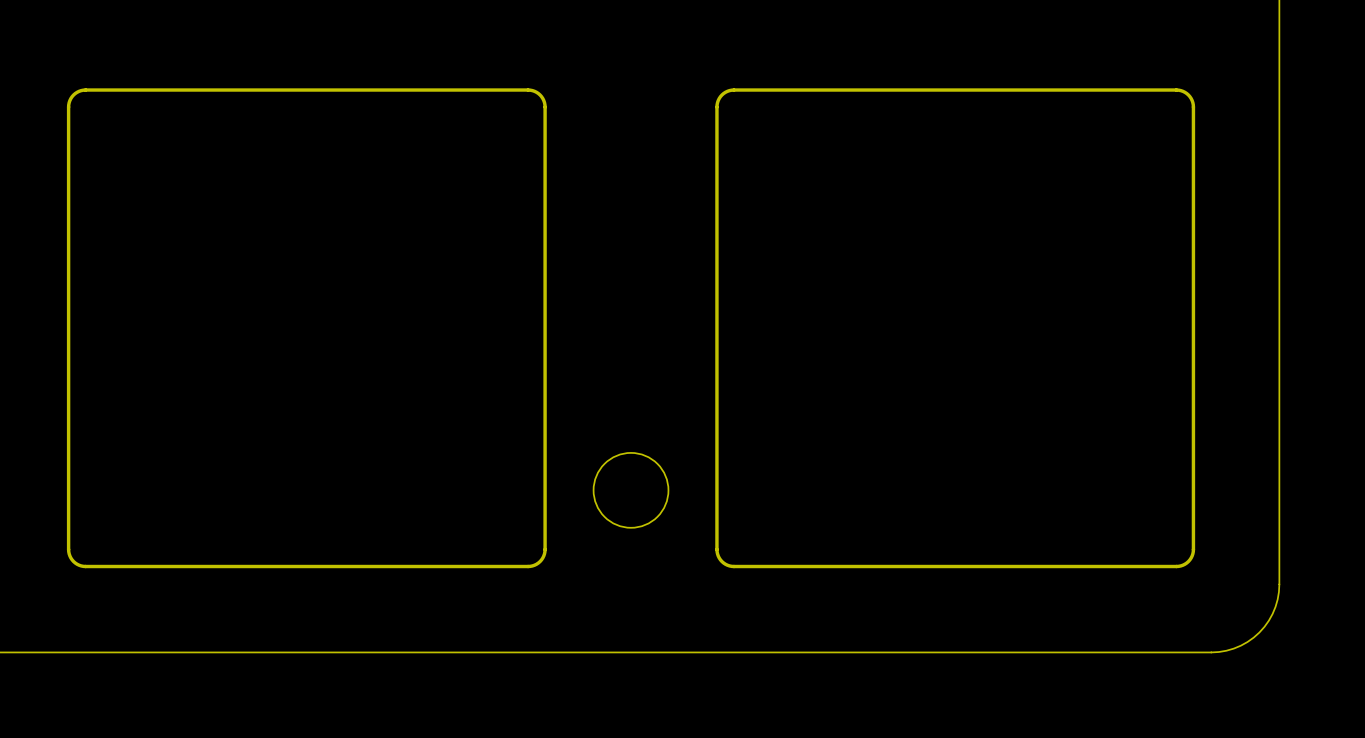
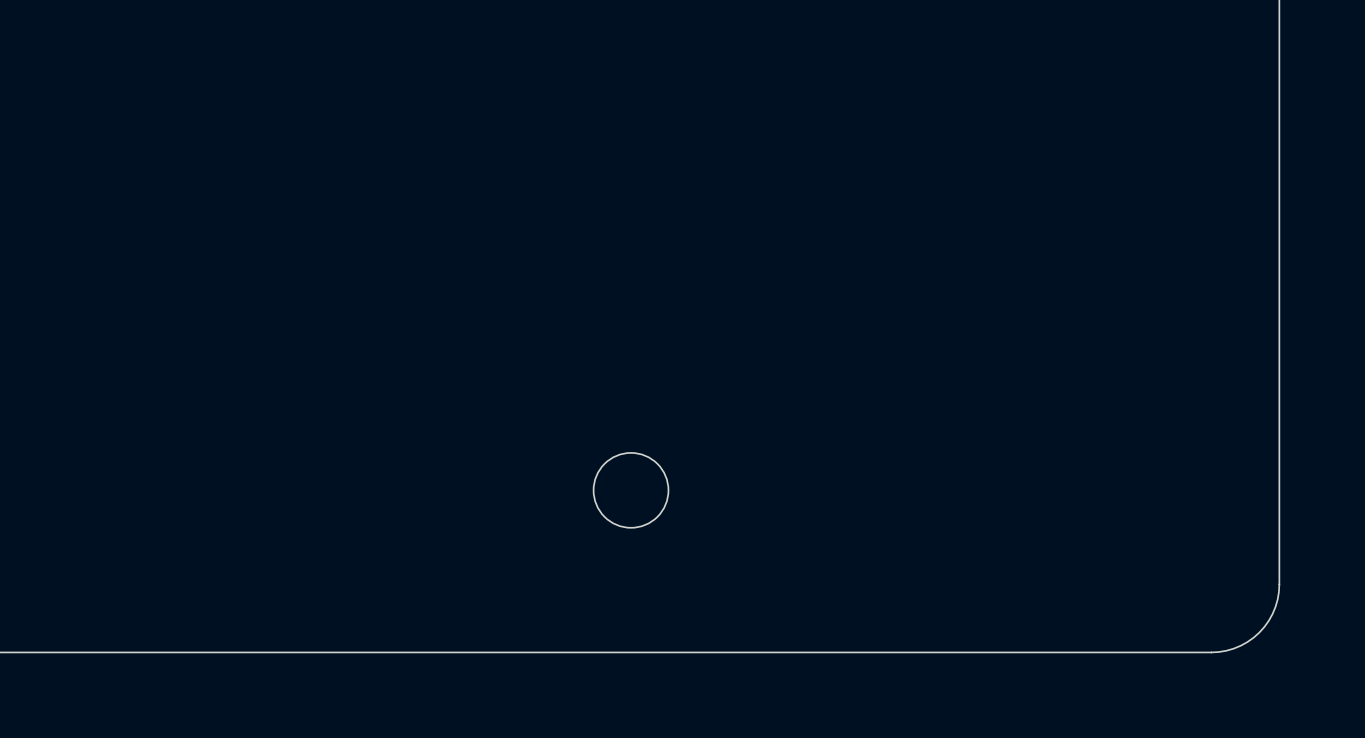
drawing: [66, 88, 547, 569] -> none
drawing: [715, 88, 1196, 569] -> none

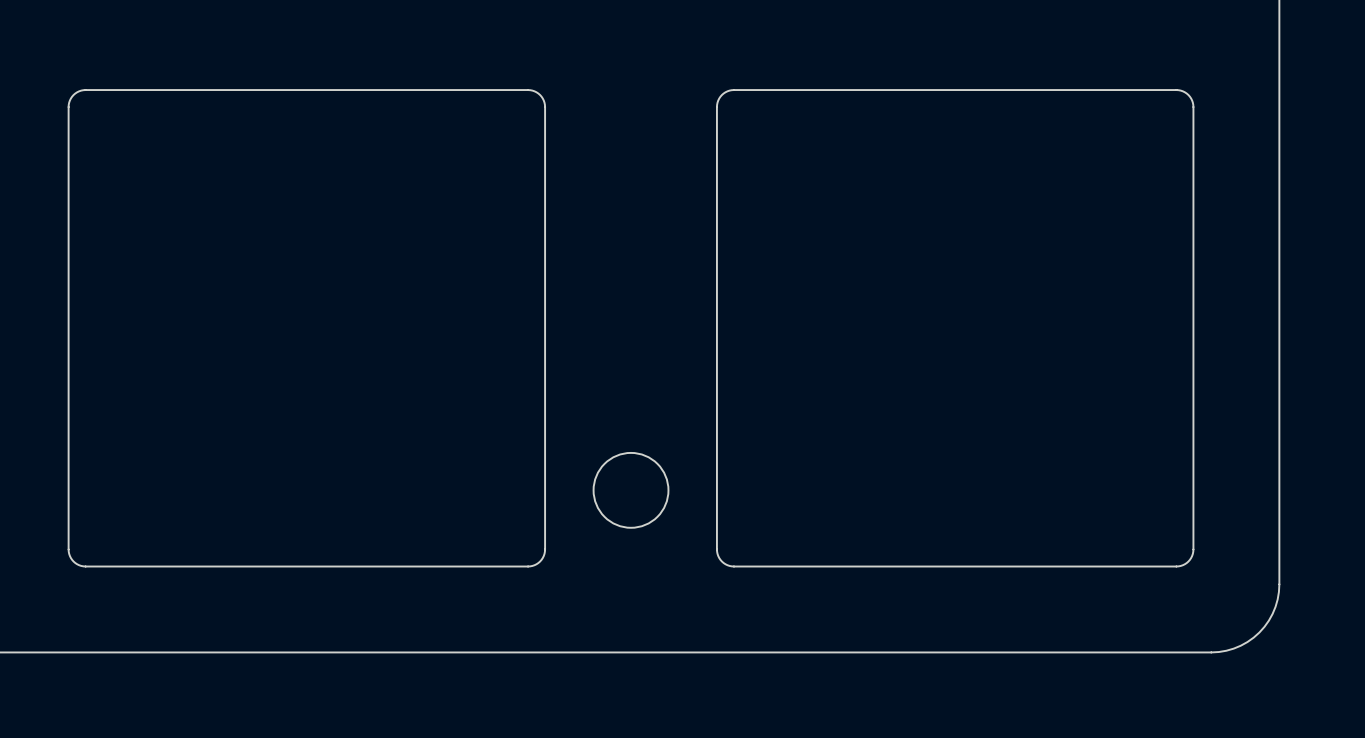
drawing: none -> [67, 89, 546, 568]
drawing: none -> [716, 89, 1195, 568]

